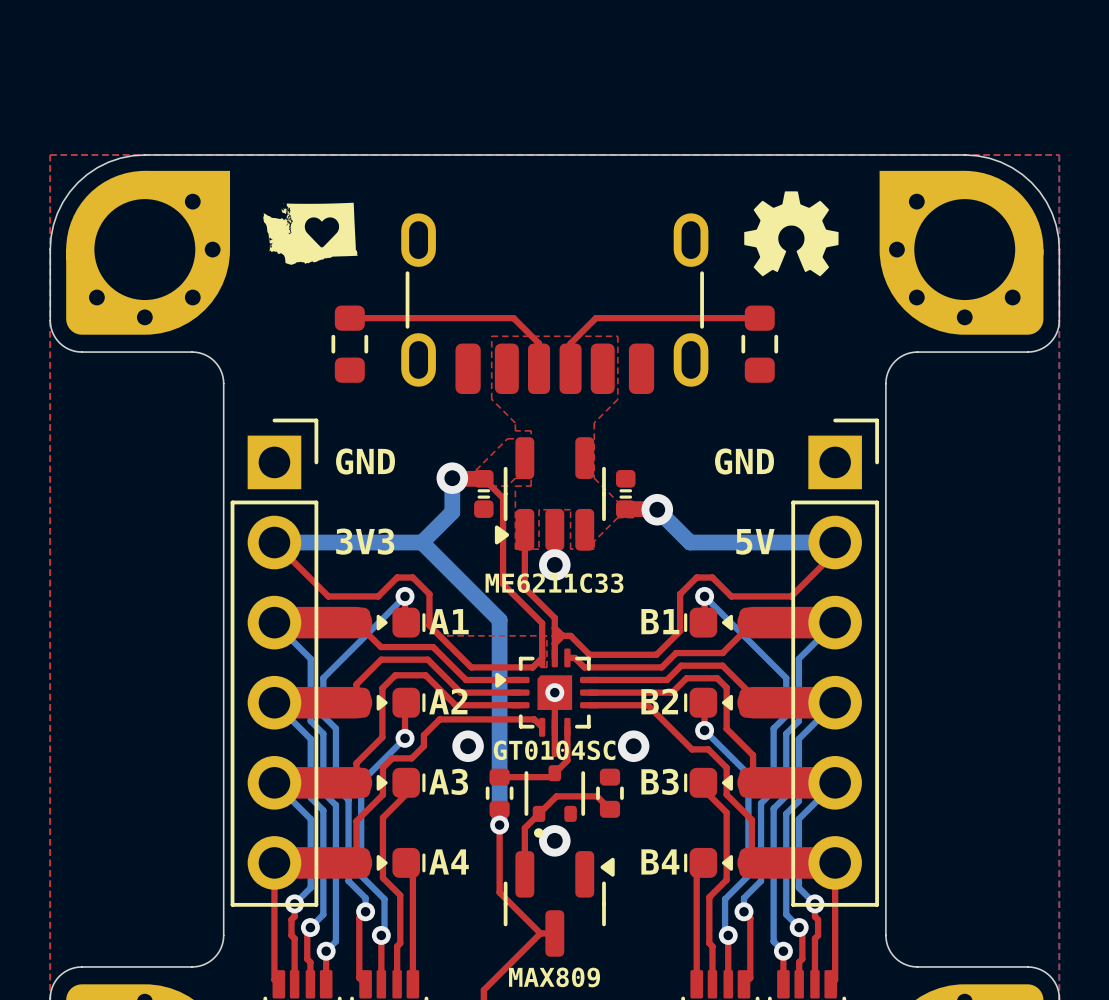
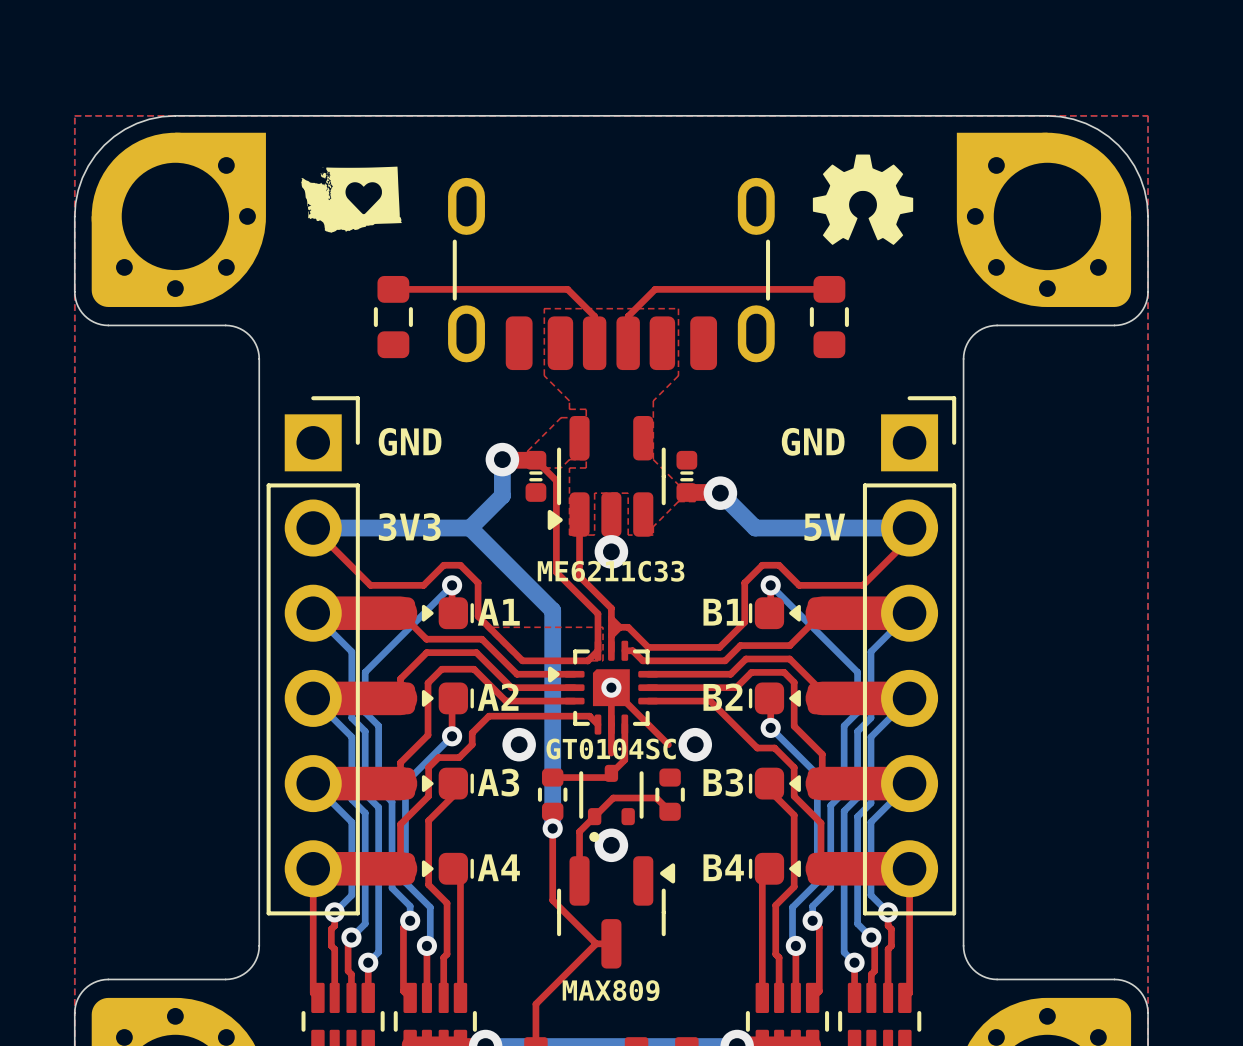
top track: none -> (611, 687) (668, 744)

